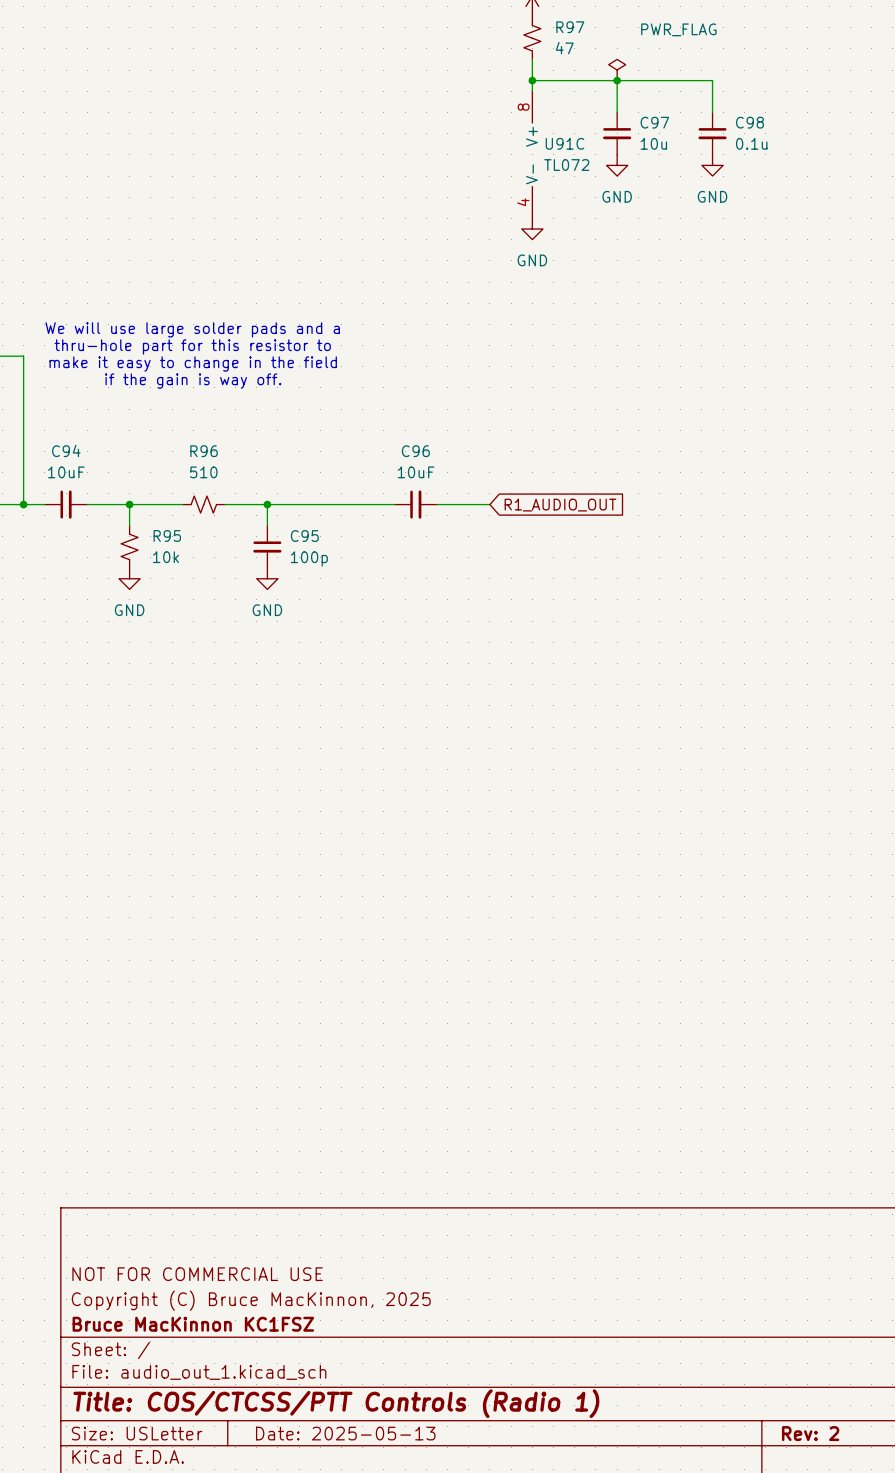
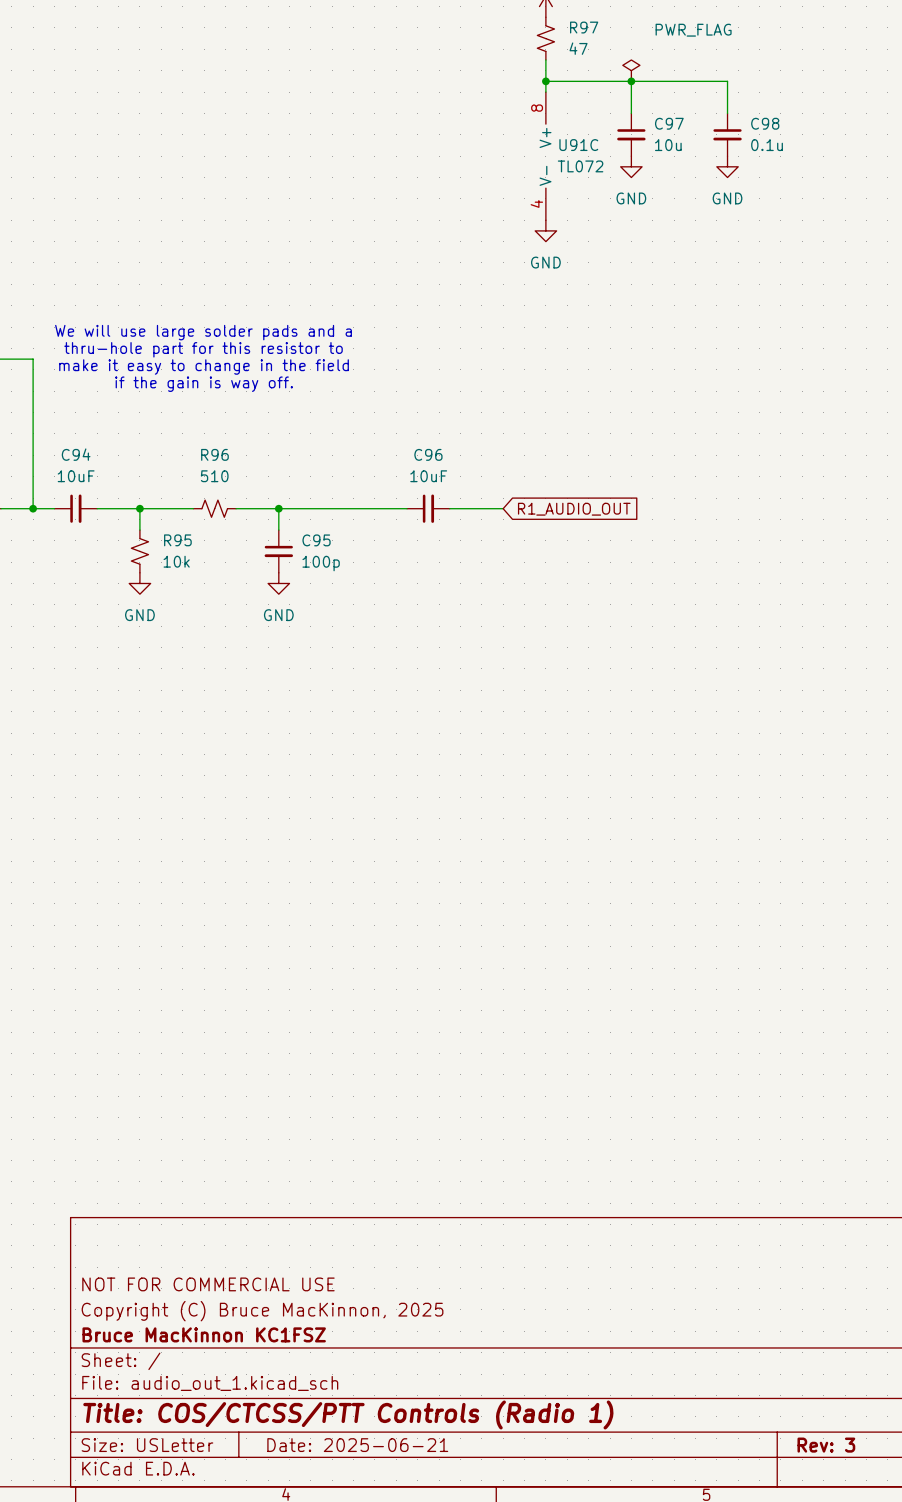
title block: Date: 2025-05-13 (345, 1433) -> Date: 2025-06-21 (357, 1445)
title block: Rev: 2 (810, 1433) -> Rev: 3 (826, 1445)

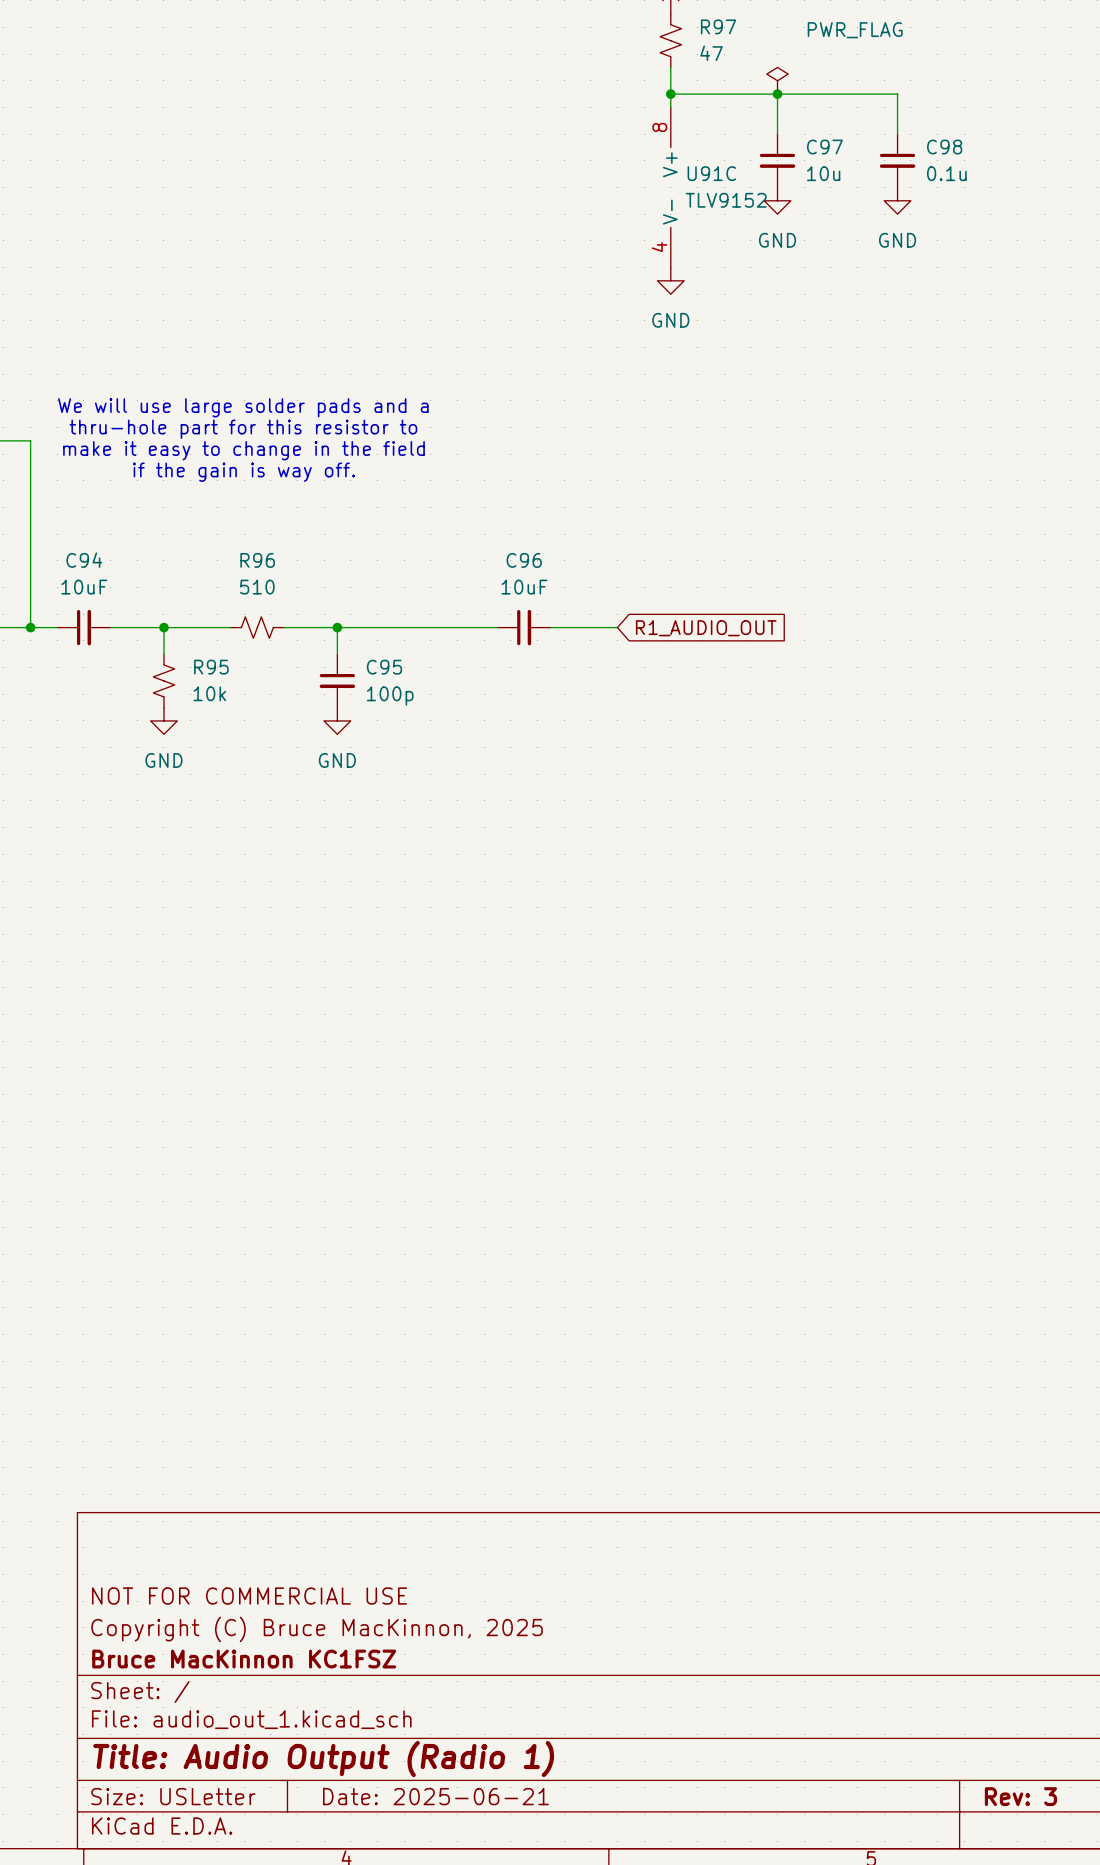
U91C value: TL072 (580, 166) -> TLV9152 (726, 200)
title block: Title: COS/CTCSS/PTT Controls (Radio 1) (348, 1414) -> Title: Audio Output (Radio 1) (323, 1759)

